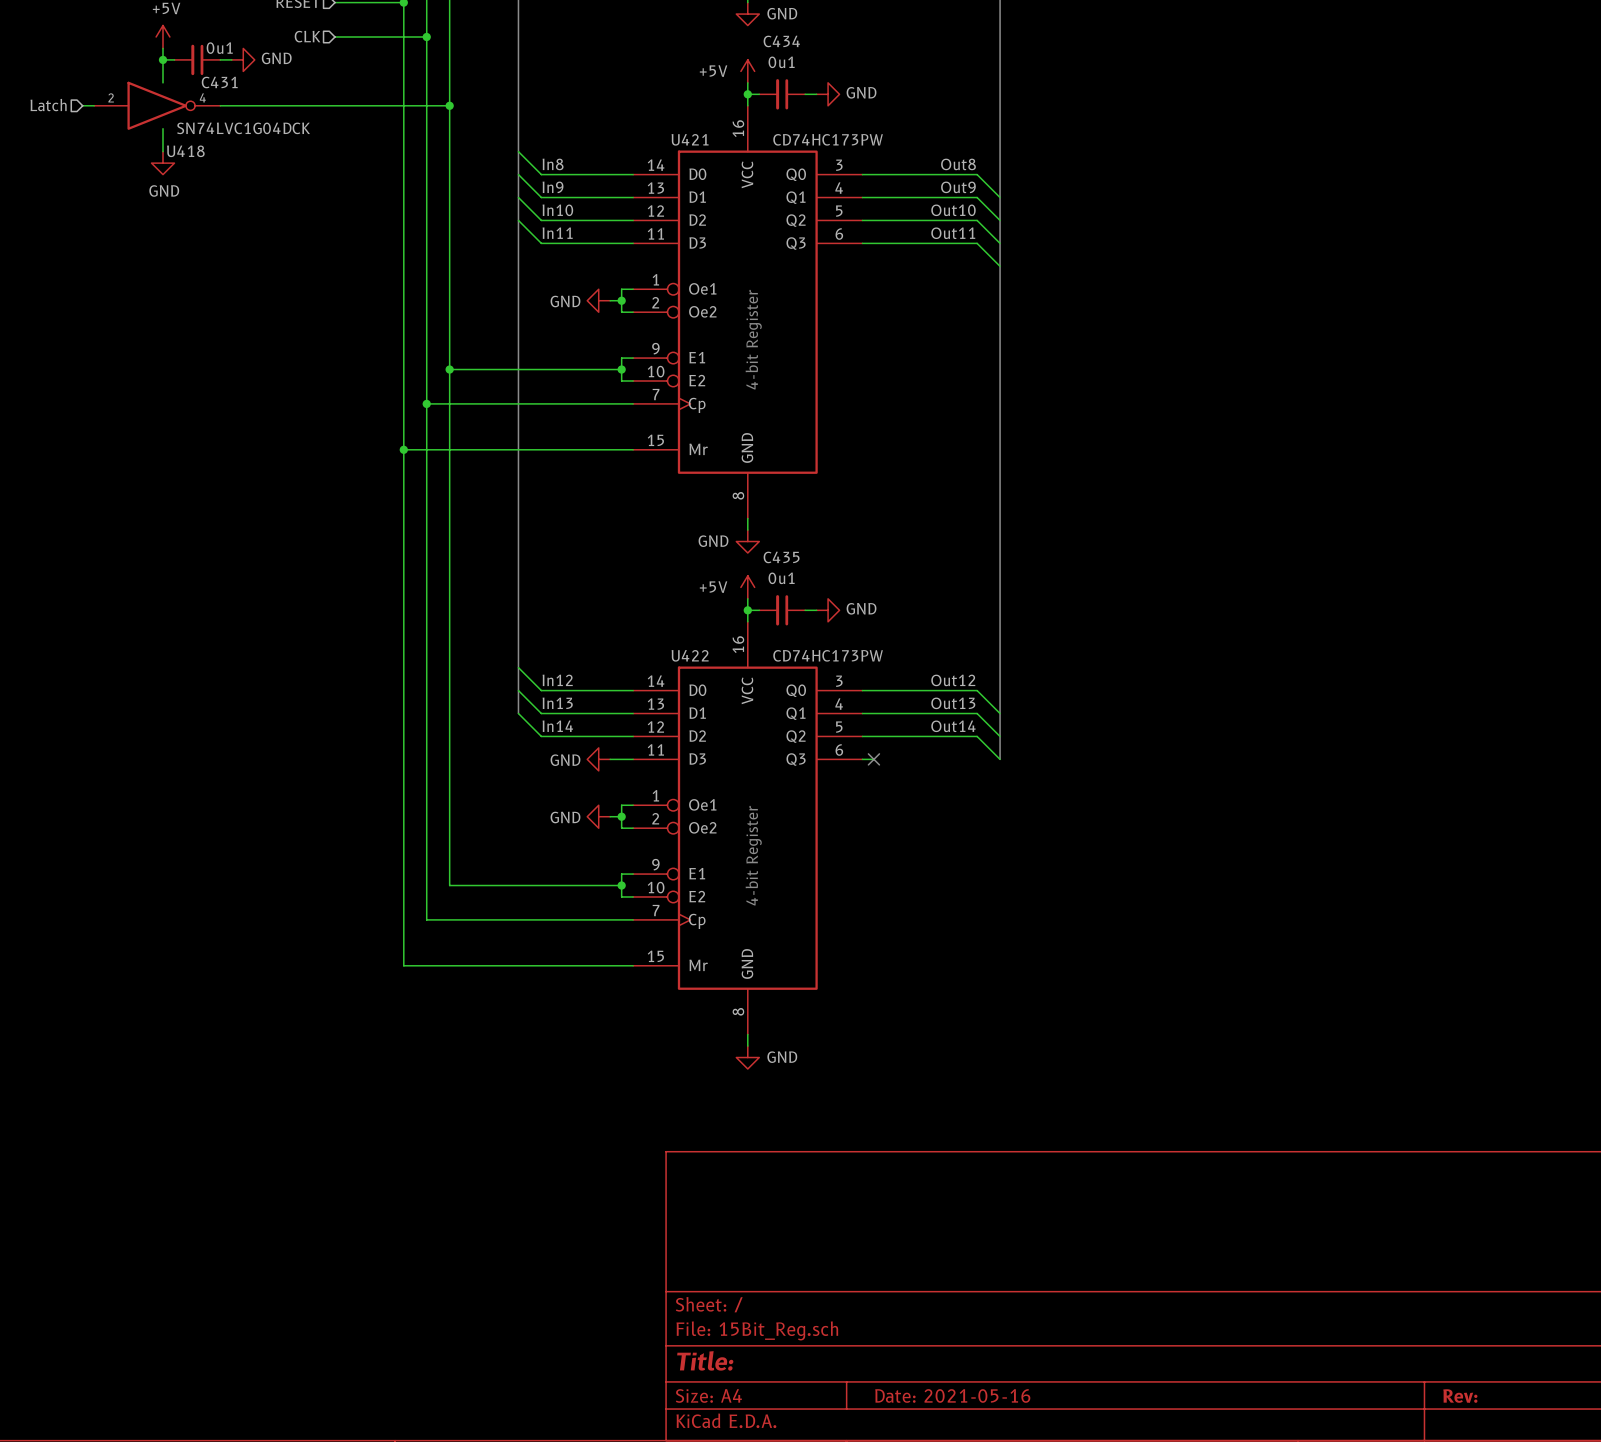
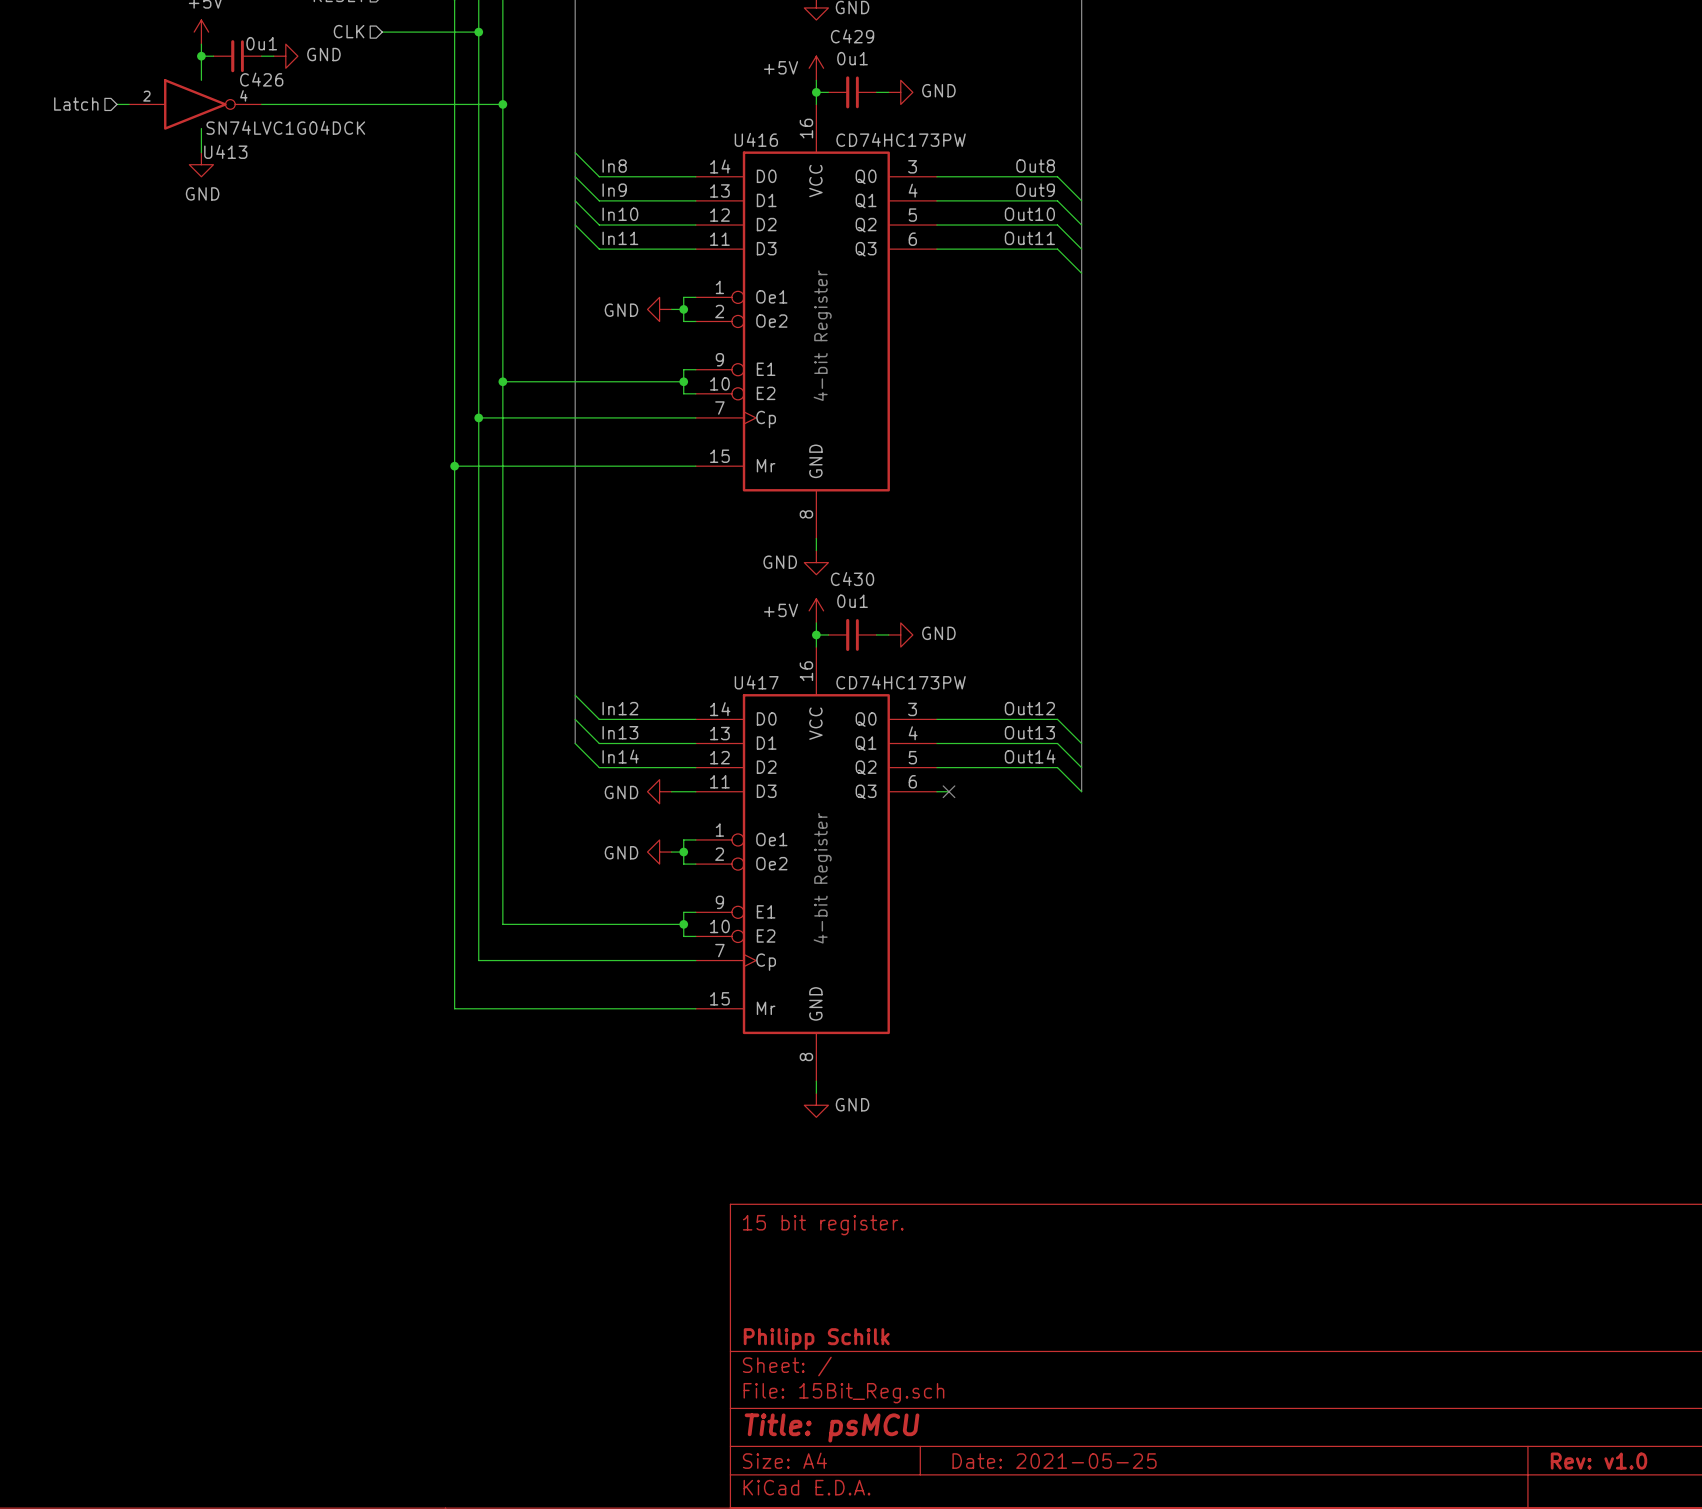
C434 name: C434 (781, 41) -> C429 (852, 36)
C431 name: C431 (219, 82) -> C426 (261, 79)
U421 name: U421 (690, 139) -> U416 (756, 139)
U418 name: U418 (185, 151) -> U413 (225, 151)
C435 name: C435 (781, 557) -> C430 (852, 579)
U422 name: U422 (690, 655) -> U417 (756, 682)
title block: none -> 15 bit register. (823, 1225)
title block: none -> Philipp Schilk (816, 1339)
title block: Title: (705, 1360) -> Title: psMCU (832, 1427)
title block: Date: 2021-05-16 (952, 1395) -> Date: 2021-05-25 (1054, 1461)
title block: Rev: (1460, 1396) -> Rev: v1.0 (1599, 1461)

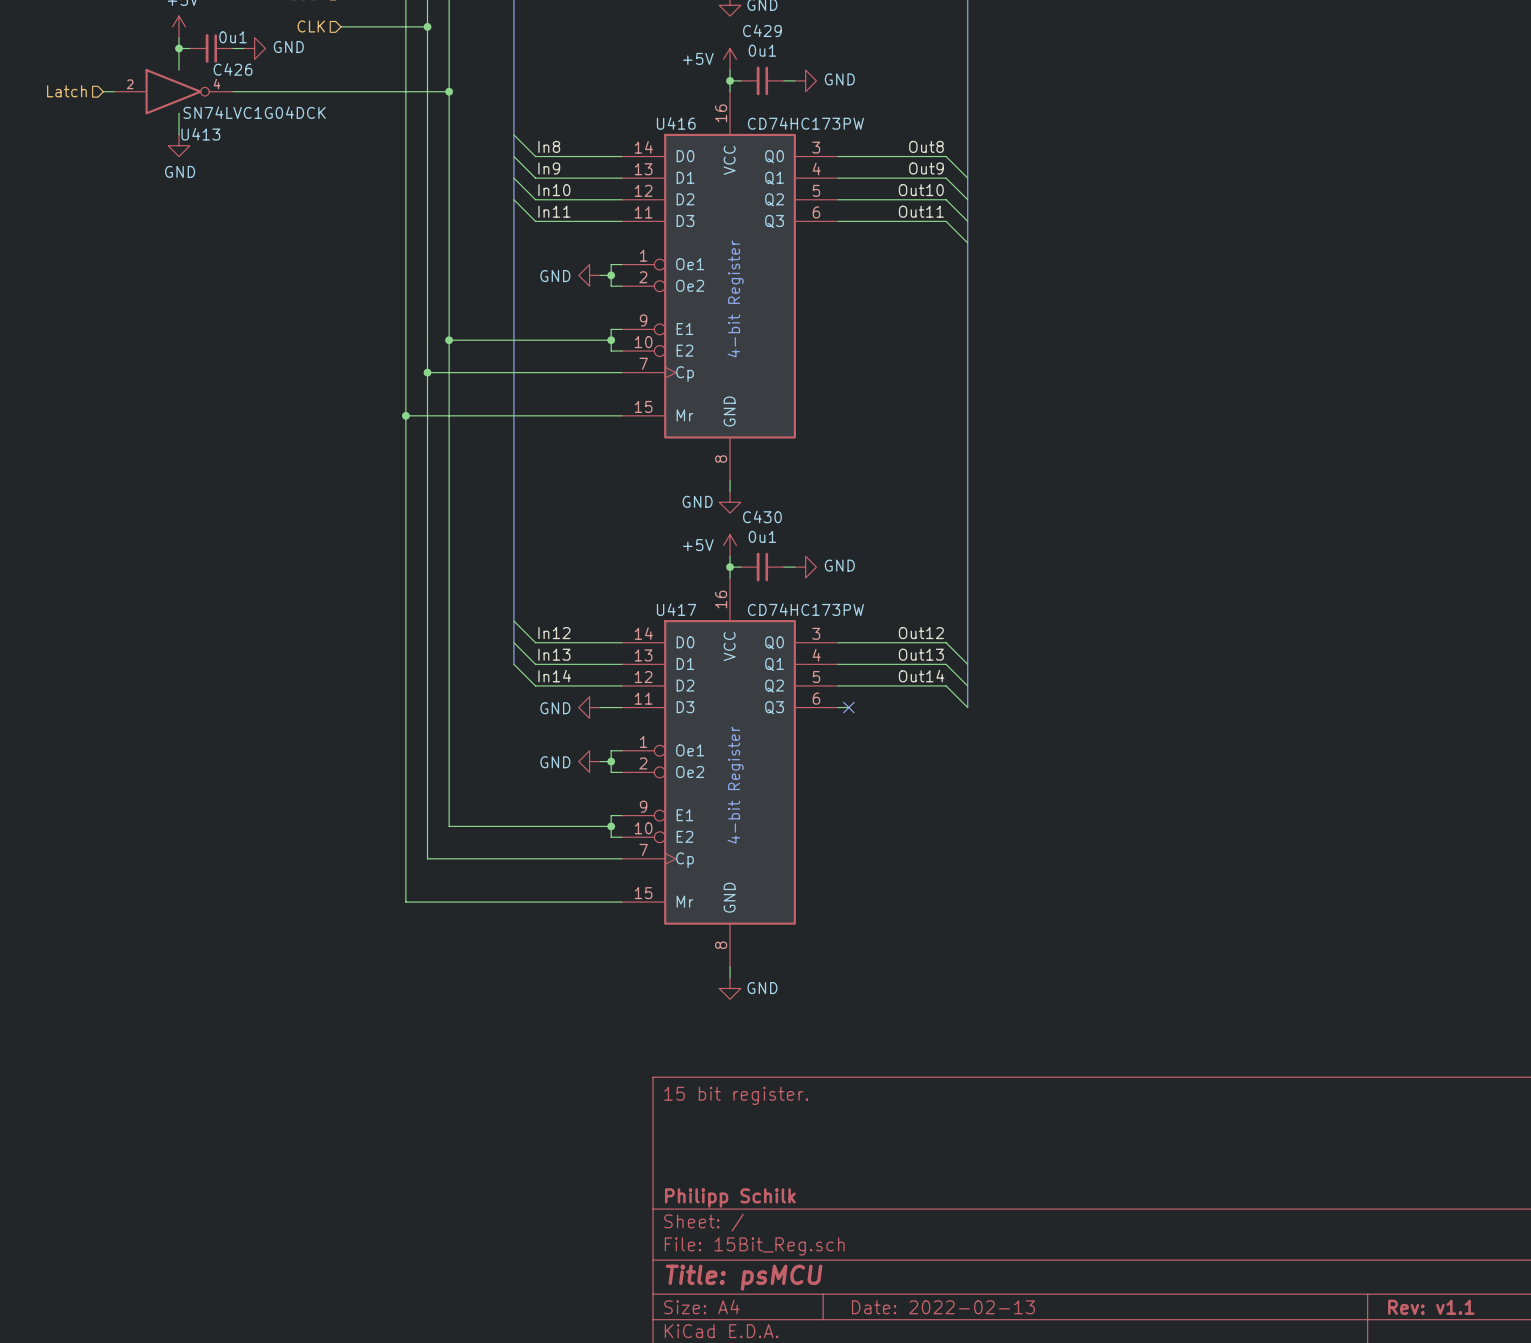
title block: Date: 2021-05-25 (1054, 1461) -> Date: 2022-02-13 (943, 1307)
title block: Rev: v1.0 (1599, 1461) -> Rev: v1.1 (1431, 1307)

